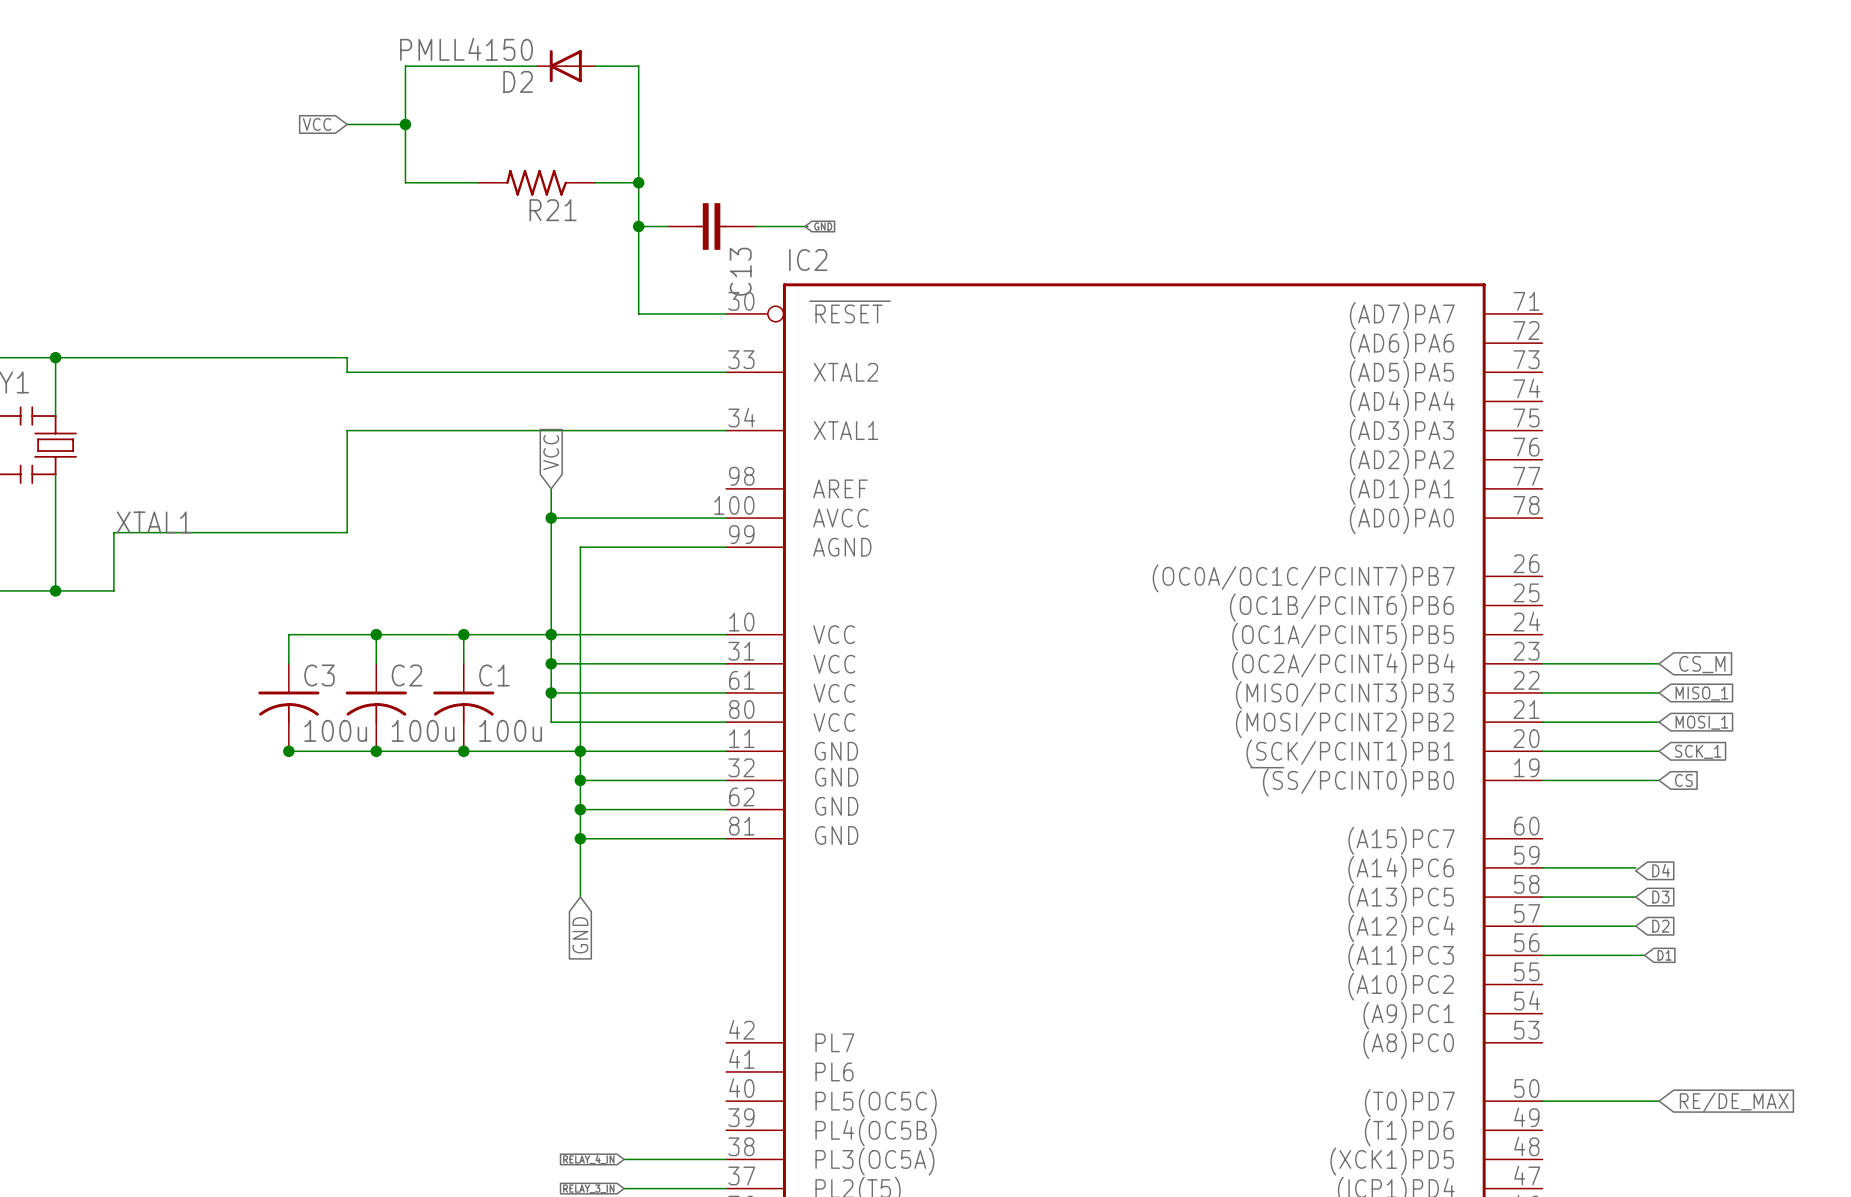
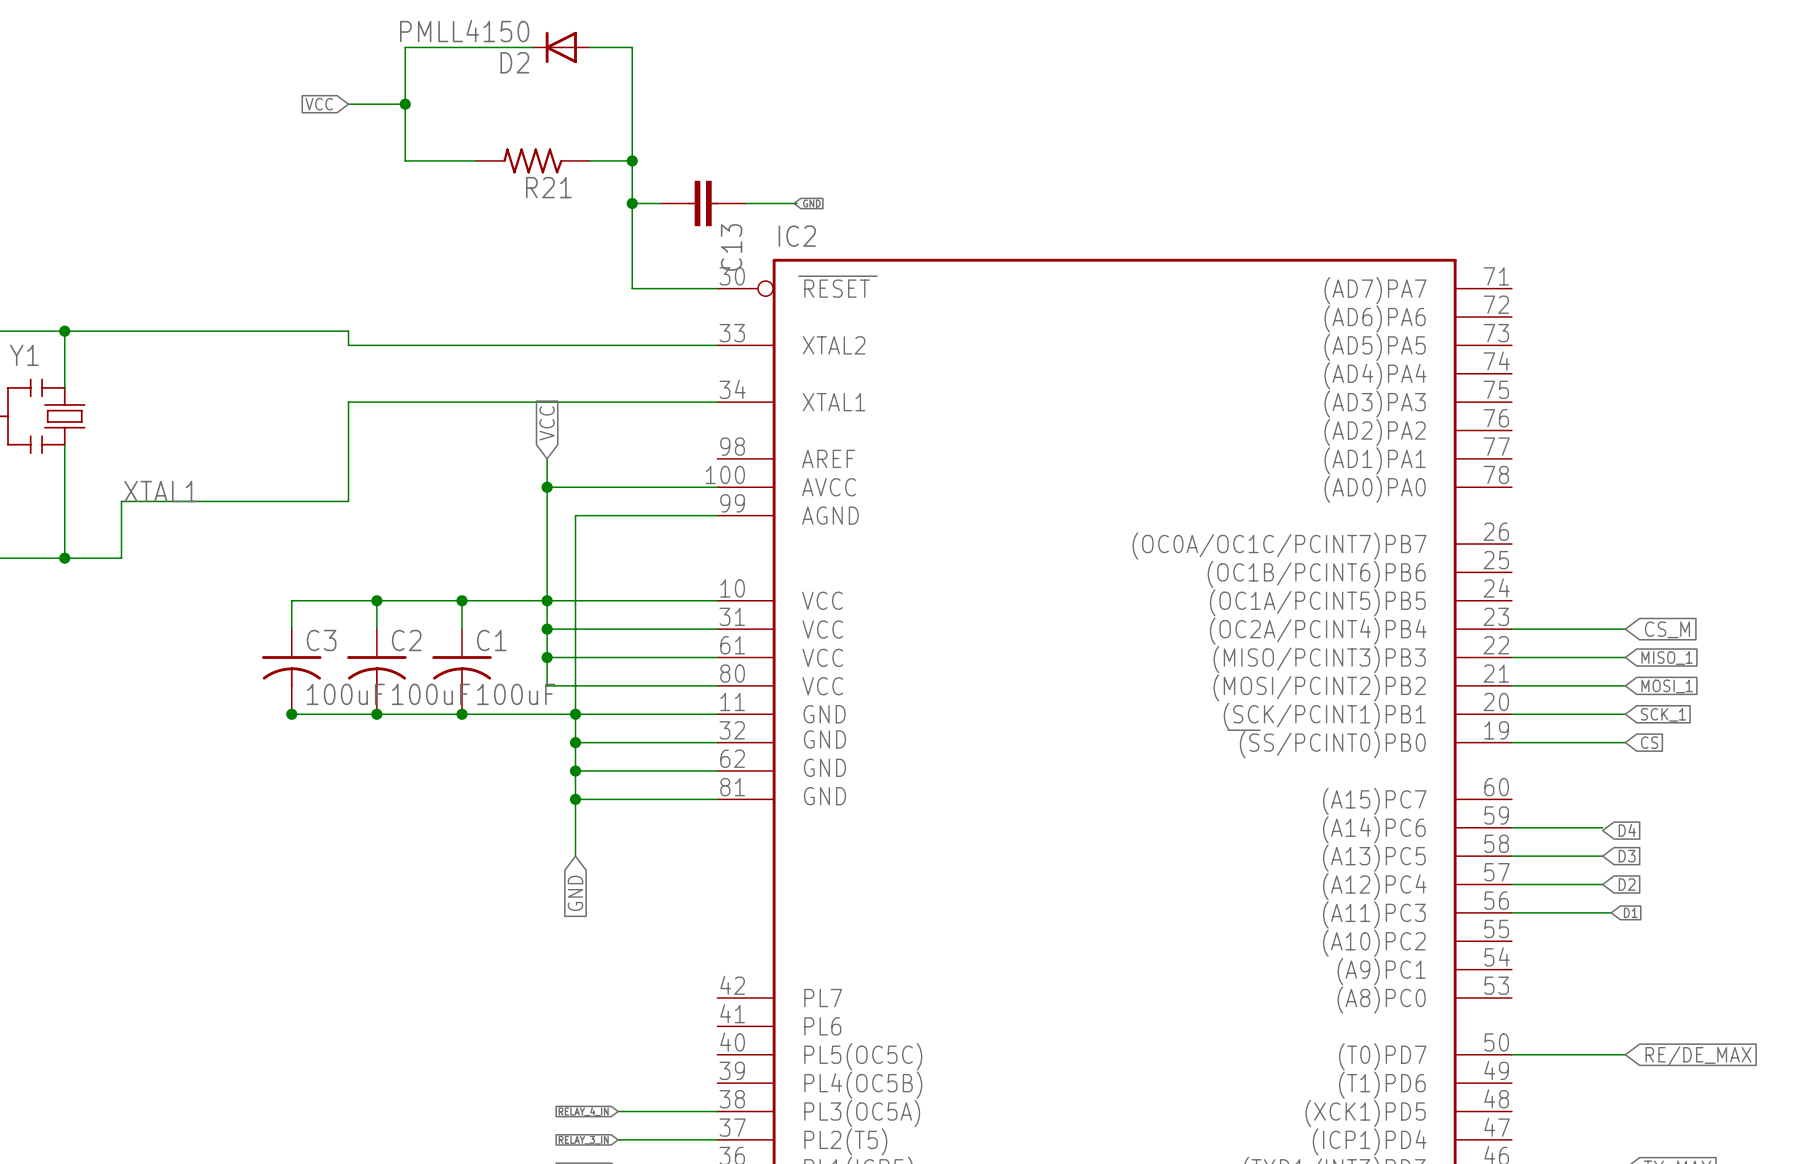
C3 value: 100u (335, 730) -> 100uF (345, 694)
C2 value: 100u (423, 730) -> 100uF (430, 694)
C1 value: 100u (510, 730) -> 100uF (516, 694)

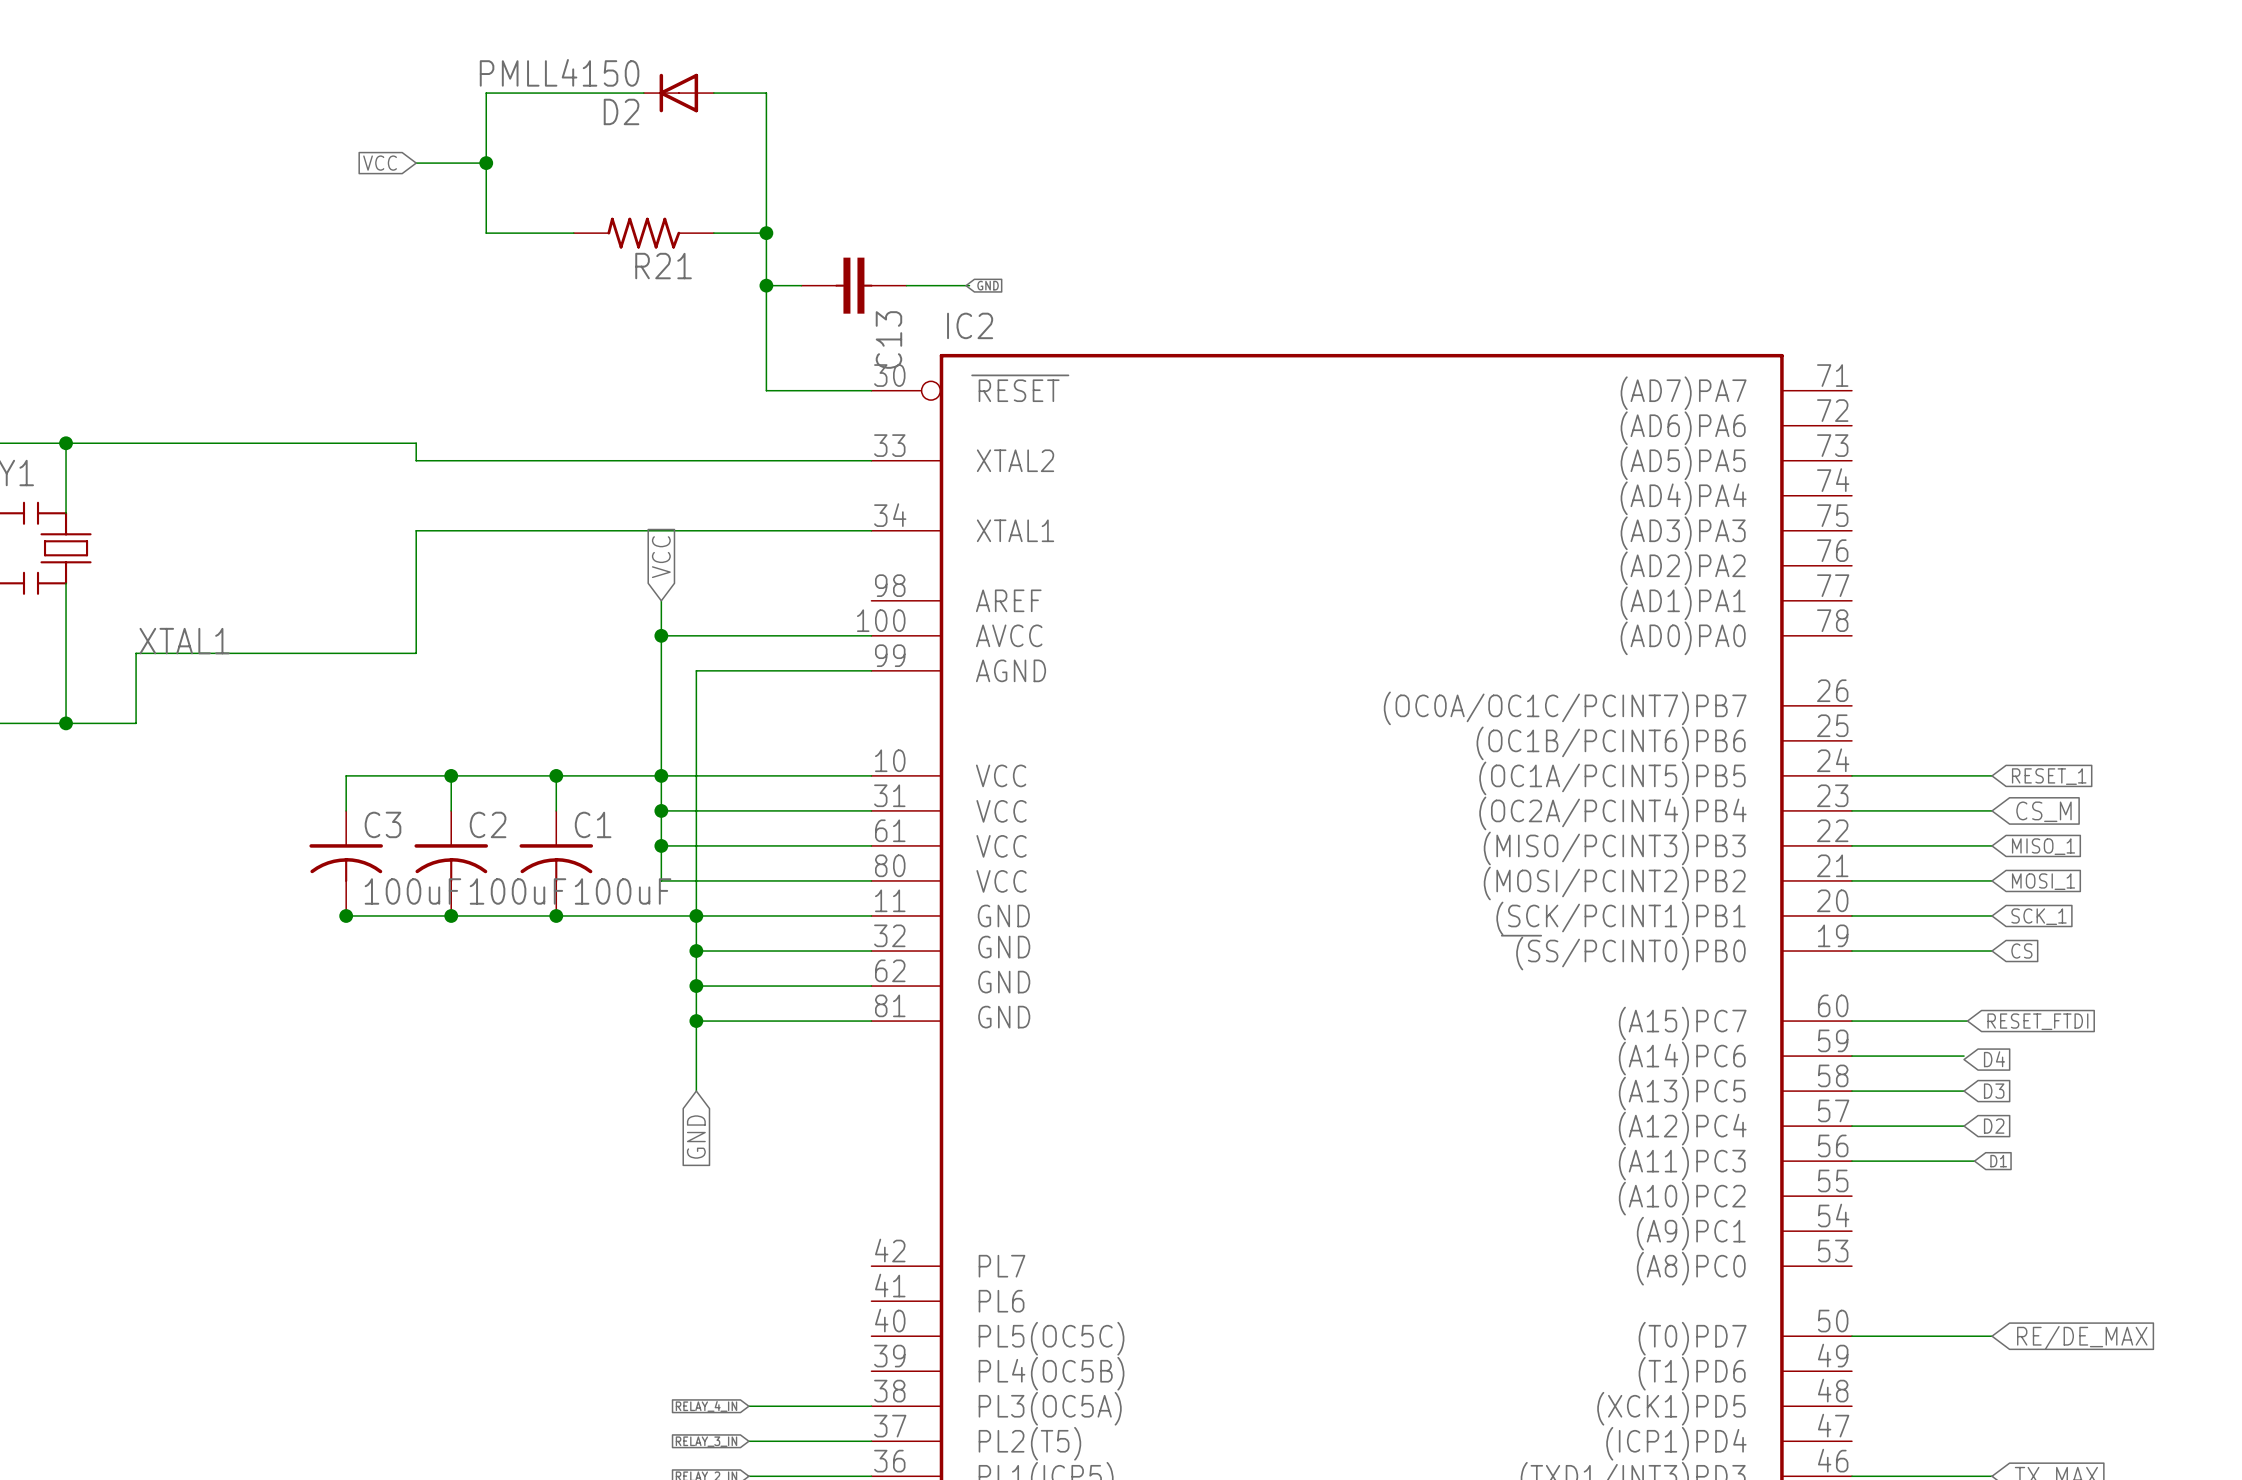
wire: none -> (1851, 775) (1992, 775)
global label: none -> RESET_1 (2049, 776)
wire: none -> (1851, 1021) (1967, 1021)
global label: none -> RESET_FTDI (2037, 1021)

